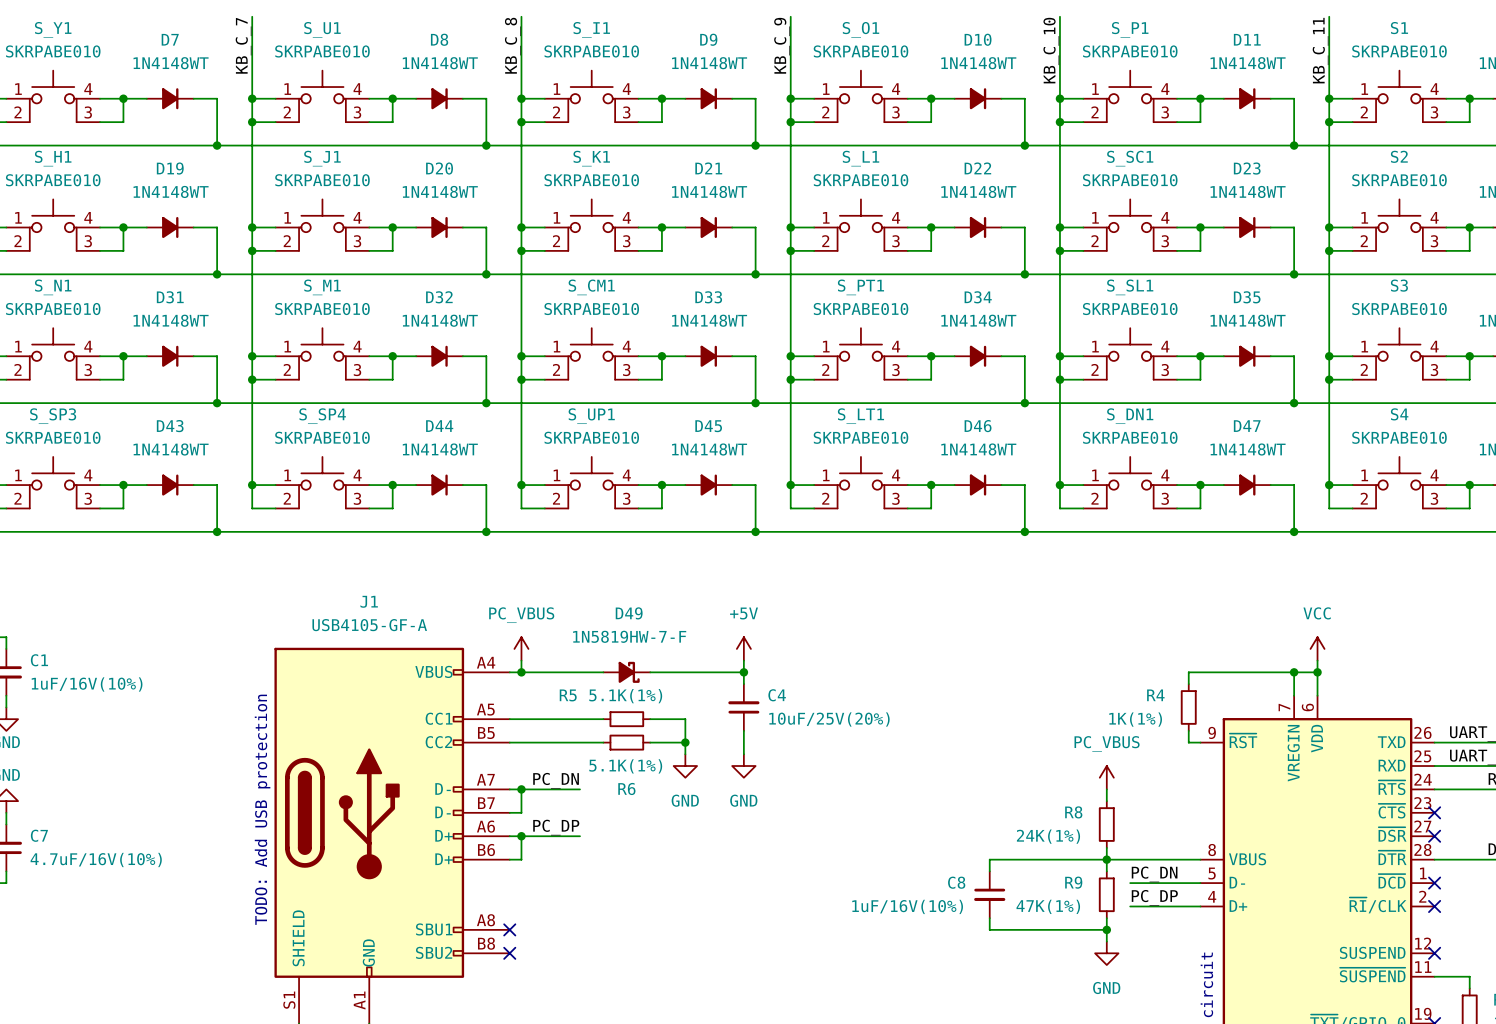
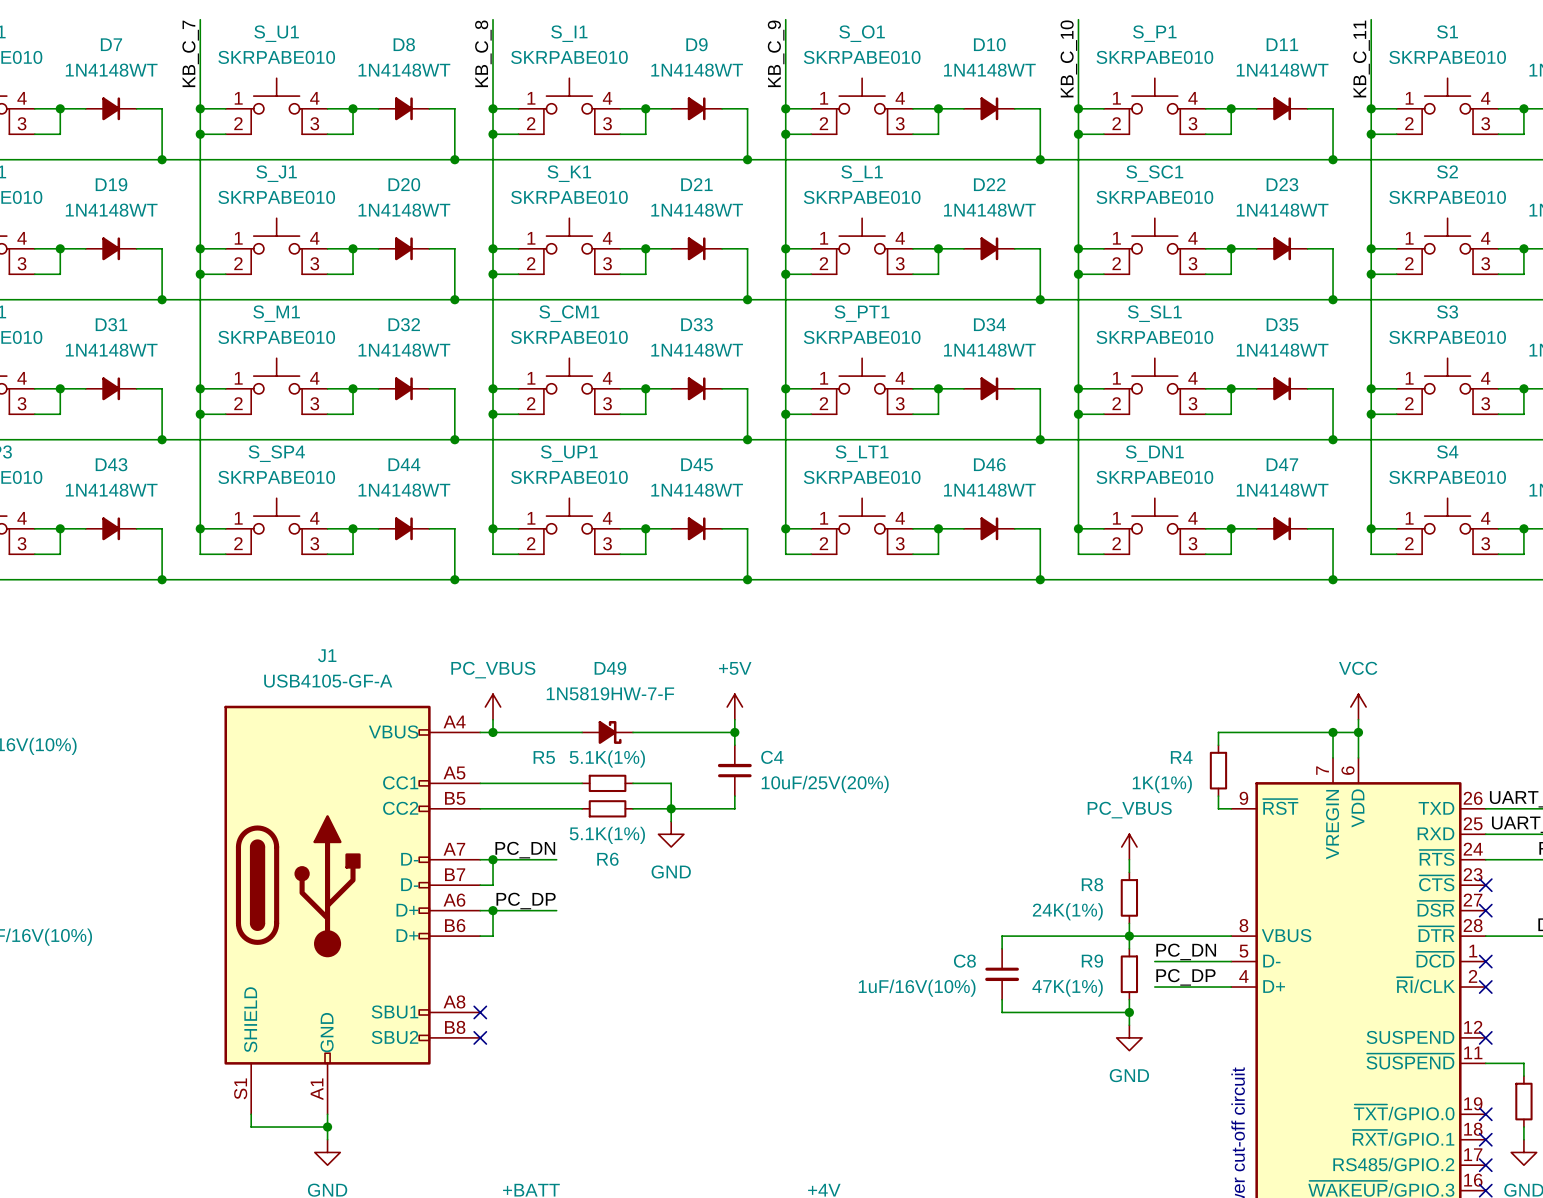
wire: (743, 742) (743, 754) -> (734, 808) (671, 808)
power symbol: GND (743, 766) -> none
text: TODO: Add USB protection (262, 809) -> none

